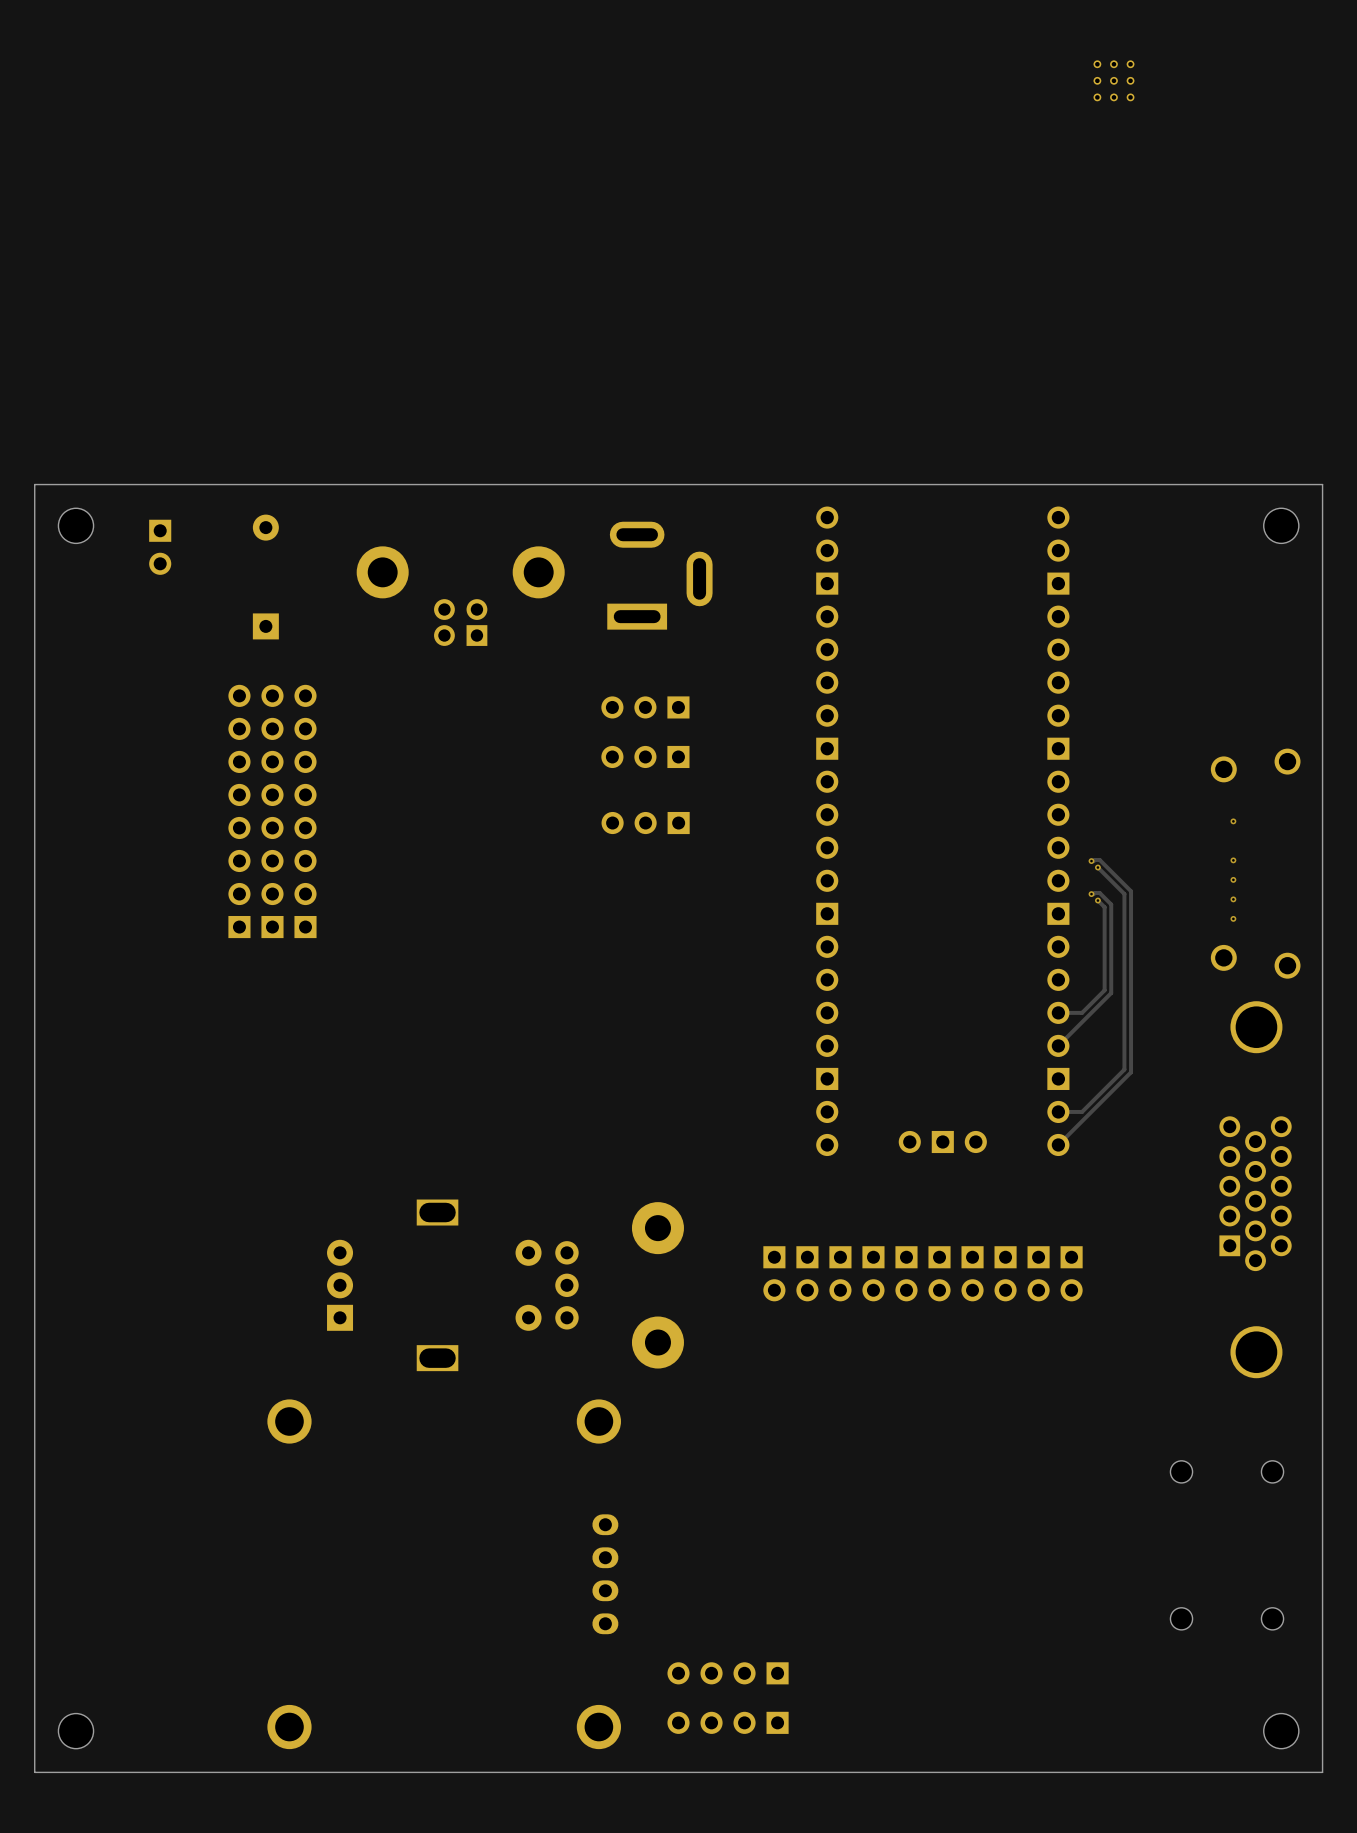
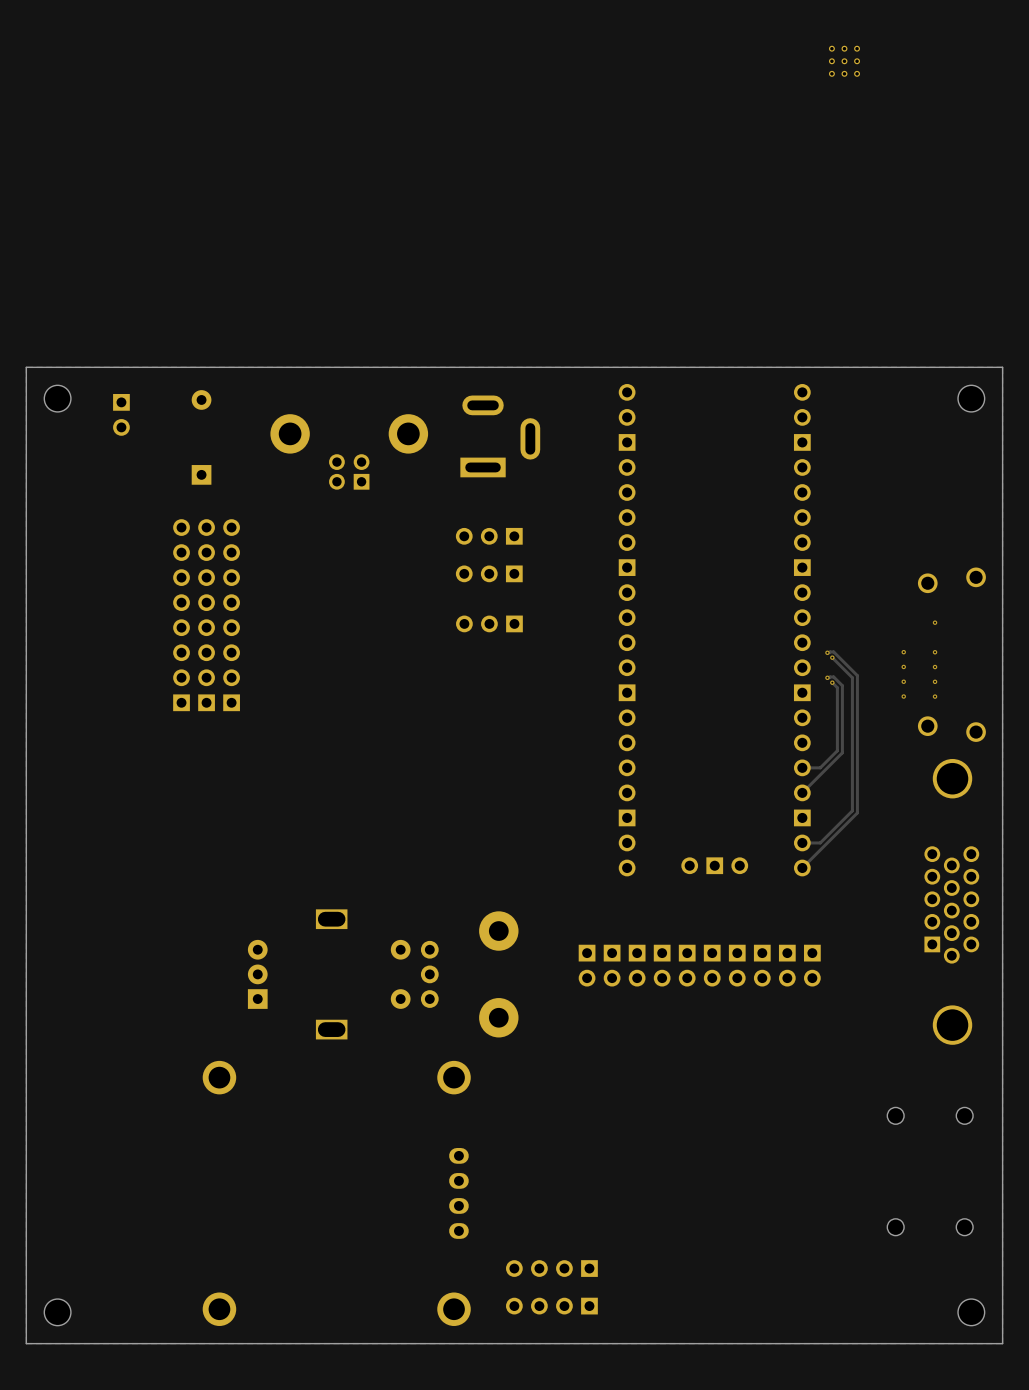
via: none -> (903, 652)
via: none -> (903, 666)
via: none -> (903, 681)
via: none -> (903, 696)

